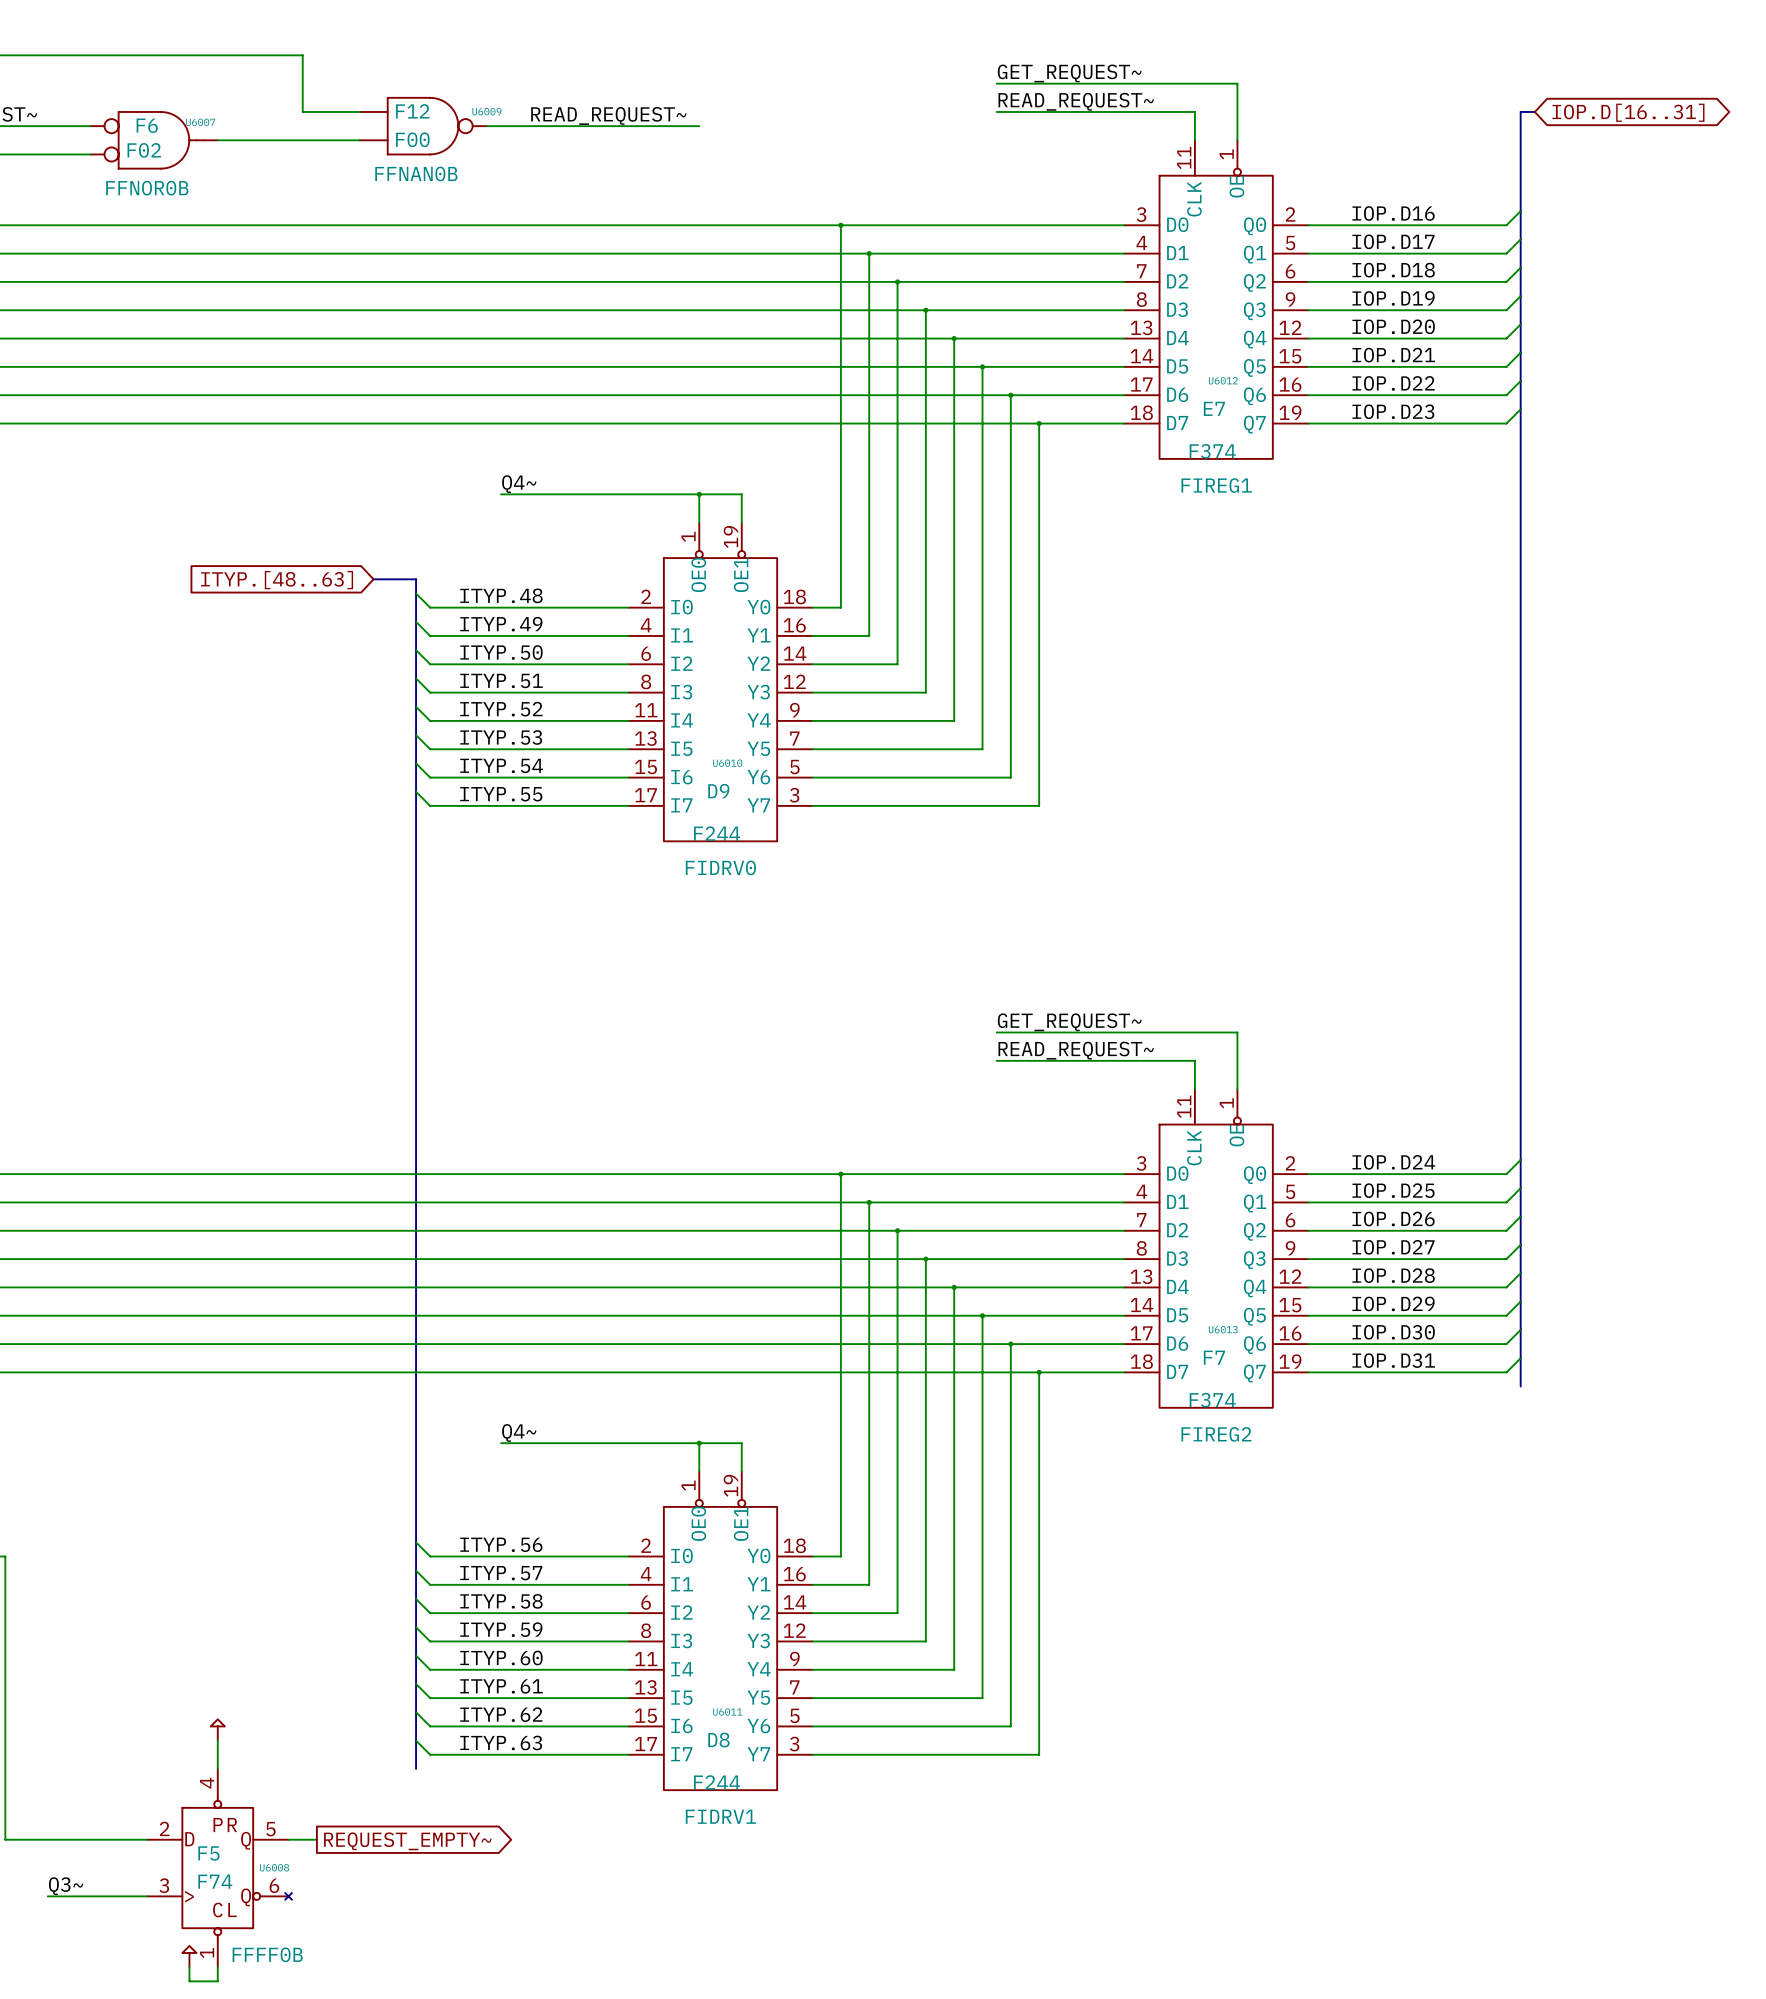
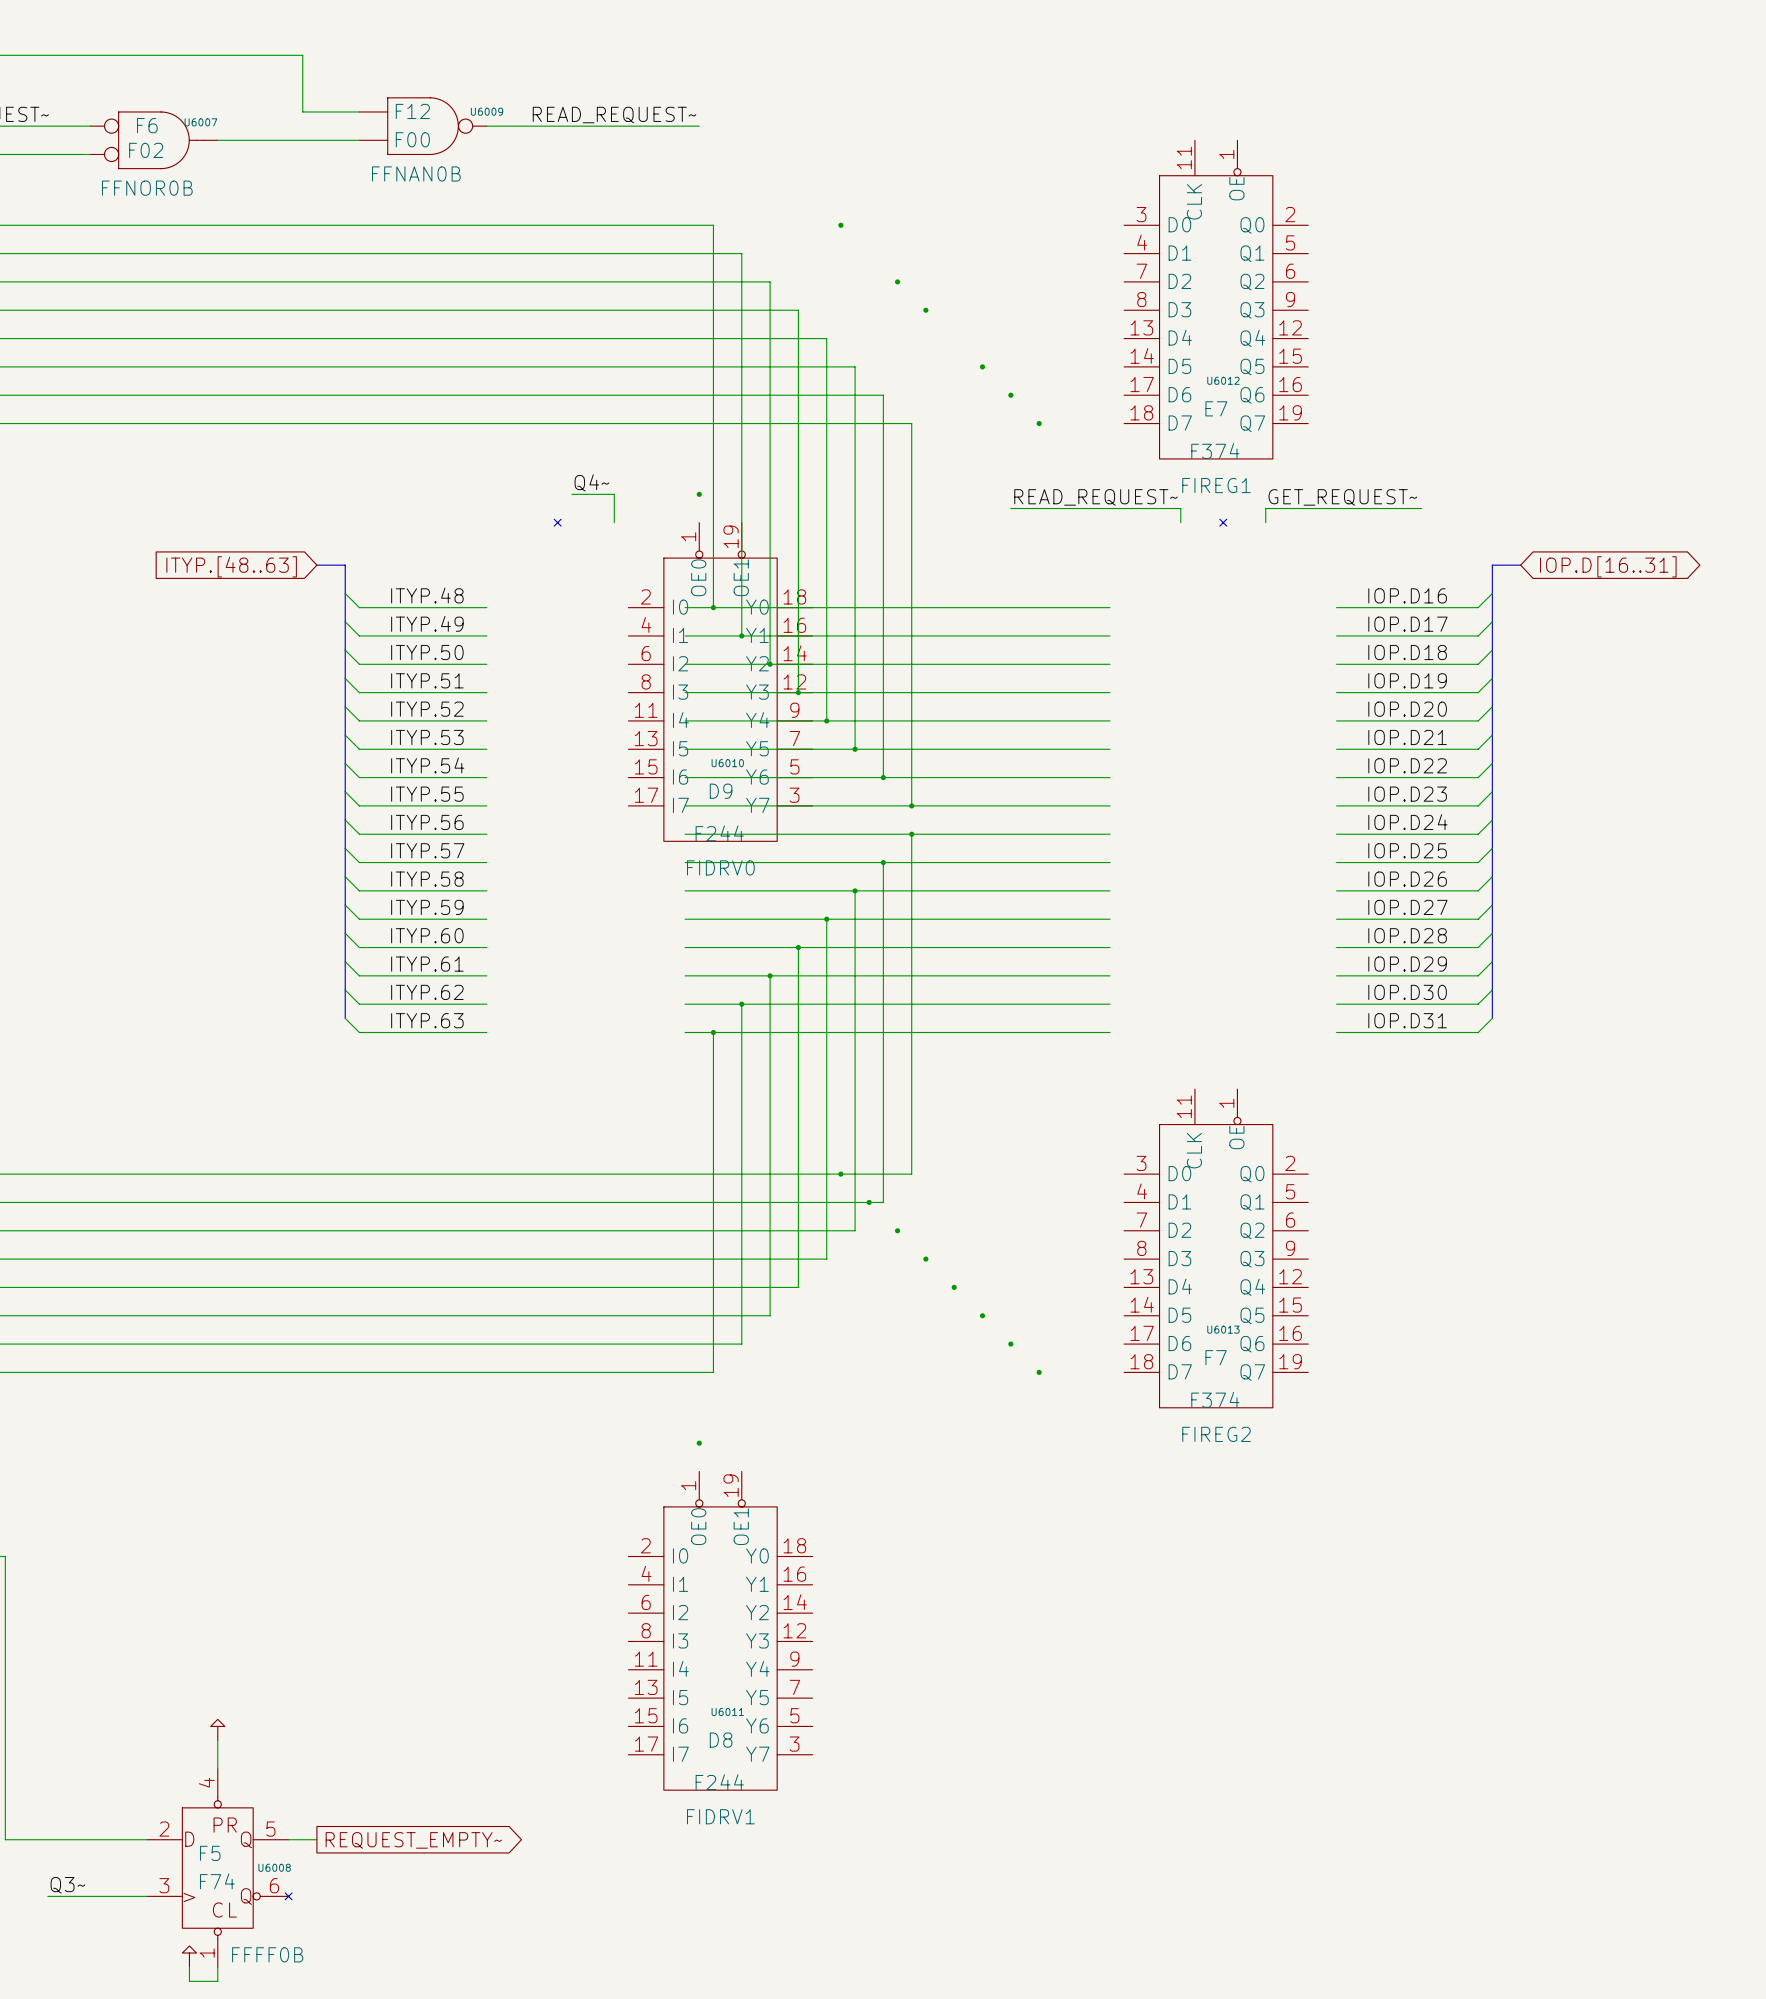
label: GET_REQUEST~ (1069, 73) -> none
wire: (996, 83) (1237, 83) (1237, 140) -> none
label: READ_REQUEST~ (1076, 101) -> none
wire: (996, 111) (1194, 111) (1194, 140) -> none
bus: (1534, 111) (1520, 111) (1520, 1386) -> none
global label: IOP.D[16..31] (1628, 112) -> none
wire: (1520, 211) (1506, 225) (1308, 225) -> none
label: IOP.D16 (1393, 213) -> none
wire: (713, 225) (1124, 225) -> (713, 225) (713, 607)
wire: (840, 225) (840, 607) -> (1109, 607) (840, 607)
wire: (1520, 239) (1506, 253) (1308, 253) -> none
label: IOP.D17 (1393, 241) -> none
wire: (741, 253) (1124, 253) -> (741, 253) (741, 494)
wire: (869, 253) (869, 635) -> (1109, 635) (869, 635)
junction: (869, 253) -> none
wire: (1520, 267) (1506, 281) (1308, 281) -> none
label: IOP.D18 (1393, 270) -> none
wire: (770, 281) (1124, 281) -> (770, 281) (770, 664)
wire: (897, 281) (897, 664) -> (1109, 664) (897, 664)
wire: (1520, 296) (1506, 310) (1308, 310) -> none
label: IOP.D19 (1393, 298) -> none
wire: (798, 310) (1124, 310) -> (798, 310) (798, 692)
wire: (925, 310) (925, 692) -> (1109, 692) (925, 692)
wire: (1520, 324) (1506, 338) (1308, 338) -> none
label: IOP.D20 (1393, 326) -> none
wire: (826, 338) (1124, 338) -> (826, 338) (826, 720)
wire: (954, 338) (954, 720) -> (1109, 720) (954, 720)
junction: (954, 338) -> none
wire: (1520, 352) (1506, 366) (1308, 366) -> none
label: IOP.D21 (1393, 355) -> none
wire: (855, 366) (1124, 366) -> (855, 366) (855, 749)
wire: (982, 366) (982, 749) -> (1109, 749) (982, 749)
wire: (1520, 381) (1506, 395) (1308, 395) -> none
label: IOP.D22 (1393, 383) -> none
wire: (883, 395) (1124, 395) -> (883, 395) (883, 777)
wire: (1010, 395) (1010, 777) -> (1109, 777) (1010, 777)
wire: (1520, 409) (1506, 423) (1308, 423) -> none
label: IOP.D23 (1393, 411) -> none
wire: (911, 423) (1124, 423) -> (911, 423) (911, 805)
wire: (1039, 423) (1039, 805) -> (1109, 805) (1039, 805)
label position: Q4~ (519, 484) -> Q4~ (591, 482)
wire: (501, 494) (571, 494) -> none
wire: (614, 494) (741, 494) -> (614, 494) (614, 522)
wire: (699, 494) (699, 522) -> none
label: none -> READ_REQUEST~ (1096, 497)
label: none -> GET_REQUEST~ (1342, 497)
wire: none -> (1010, 508) (1180, 508) (1180, 522)
wire: none -> (1421, 508) (1265, 508) (1265, 522)
no-connect mark: none -> (557, 522)
wire: none -> (741, 522) (741, 635)
no-connect mark: none -> (1223, 522)
bus: none -> (316, 565) (345, 565) (345, 1018)
bus: none -> (1520, 565) (1492, 565) (1492, 1018)
global label: none -> IOP.D[16..31] (1608, 566)
bus: (373, 579) (416, 579) (416, 1768) -> none
global label position: ITYP.[48..63] (277, 580) -> ITYP.[48..63] (231, 566)
wire: (416, 593) (430, 607) -> (345, 593) (359, 607) (430, 607)
wire: none -> (1492, 593) (1478, 607) (1336, 607)
label position: ITYP.48 (501, 595) -> ITYP.48 (427, 595)
label: none -> IOP.D16 (1407, 595)
wire: (486, 607) (628, 607) -> none
wire: none -> (685, 607) (812, 607)
junction: none -> (713, 607)
wire: (416, 621) (430, 635) -> (345, 621) (359, 635) (430, 635)
wire: none -> (1492, 621) (1478, 635) (1336, 635)
label position: ITYP.49 (501, 624) -> ITYP.49 (427, 623)
label: none -> IOP.D17 (1407, 624)
wire: (486, 635) (628, 635) -> none
wire: none -> (685, 635) (812, 635)
junction: none -> (741, 635)
wire: (416, 650) (430, 664) -> (345, 650) (359, 664) (430, 664)
wire: none -> (1492, 650) (1478, 664) (1336, 664)
label position: ITYP.50 (501, 652) -> ITYP.50 (427, 652)
label: none -> IOP.D18 (1407, 652)
wire: (486, 664) (628, 664) -> none
wire: none -> (685, 664) (812, 664)
junction: none -> (770, 664)
wire: (416, 678) (430, 692) -> (345, 678) (359, 692) (430, 692)
wire: none -> (1492, 678) (1478, 692) (1336, 692)
label position: ITYP.51 (501, 680) -> ITYP.51 (427, 680)
label: none -> IOP.D19 (1407, 680)
wire: (486, 692) (628, 692) -> none
wire: none -> (685, 692) (812, 692)
junction: none -> (798, 692)
wire: (416, 706) (430, 720) -> (345, 706) (359, 720) (430, 720)
wire: none -> (1492, 706) (1478, 720) (1336, 720)
label position: ITYP.52 (501, 709) -> ITYP.52 (427, 709)
label: none -> IOP.D20 (1407, 709)
wire: (486, 720) (628, 720) -> none
wire: none -> (685, 720) (812, 720)
junction: none -> (826, 720)
wire: (416, 735) (430, 749) -> (345, 735) (359, 749) (430, 749)
wire: none -> (1492, 735) (1478, 749) (1336, 749)
label position: ITYP.53 (501, 737) -> ITYP.53 (427, 737)
label: none -> IOP.D21 (1407, 737)
wire: (486, 749) (628, 749) -> none
wire: none -> (685, 749) (812, 749)
junction: none -> (855, 749)
wire: (416, 763) (430, 777) -> (345, 763) (359, 777) (430, 777)
wire: none -> (1492, 763) (1478, 777) (1336, 777)
label position: ITYP.54 (501, 765) -> ITYP.54 (427, 765)
label: none -> IOP.D22 (1407, 765)
wire: (486, 777) (628, 777) -> none
wire: none -> (685, 777) (812, 777)
junction: none -> (883, 777)
wire: (416, 791) (430, 805) -> (345, 791) (359, 805) (430, 805)
wire: none -> (1492, 791) (1478, 805) (1336, 805)
label position: ITYP.55 (501, 794) -> ITYP.55 (427, 794)
label: none -> IOP.D23 (1407, 794)
wire: (486, 805) (628, 805) -> none
wire: none -> (685, 805) (812, 805)
junction: none -> (911, 805)
wire: none -> (345, 820) (359, 834) (486, 834)
wire: none -> (1492, 820) (1478, 834) (1336, 834)
label: none -> ITYP.56 (427, 822)
label: none -> IOP.D24 (1407, 822)
wire: none -> (685, 834) (1109, 834)
junction: none -> (911, 834)
wire: none -> (345, 848) (359, 862) (486, 862)
wire: none -> (1492, 848) (1478, 862) (1336, 862)
label: none -> ITYP.57 (427, 850)
label: none -> IOP.D25 (1407, 850)
wire: none -> (685, 862) (1109, 862)
junction: none -> (883, 862)
wire: none -> (345, 876) (359, 890) (486, 890)
wire: none -> (1492, 876) (1478, 890) (1336, 890)
label: none -> ITYP.58 (427, 879)
label: none -> IOP.D26 (1407, 879)
wire: none -> (685, 890) (1109, 890)
junction: none -> (855, 890)
wire: none -> (345, 905) (359, 919) (486, 919)
wire: none -> (1492, 905) (1478, 919) (1336, 919)
label: none -> ITYP.59 (427, 907)
label: none -> IOP.D27 (1407, 907)
wire: none -> (685, 919) (1109, 919)
junction: none -> (826, 919)
wire: none -> (345, 933) (359, 947) (486, 947)
wire: none -> (1492, 933) (1478, 947) (1336, 947)
label: none -> ITYP.60 (427, 935)
label: none -> IOP.D28 (1407, 935)
wire: none -> (685, 947) (1109, 947)
junction: none -> (798, 947)
wire: none -> (345, 961) (359, 975) (486, 975)
wire: none -> (1492, 961) (1478, 975) (1336, 975)
label: none -> ITYP.61 (427, 964)
label: none -> IOP.D29 (1407, 964)
wire: none -> (685, 975) (1109, 975)
junction: none -> (770, 975)
wire: none -> (345, 990) (359, 1004) (486, 1004)
wire: none -> (1492, 990) (1478, 1004) (1336, 1004)
label: none -> ITYP.62 (427, 992)
label: none -> IOP.D30 (1407, 992)
wire: none -> (685, 1004) (1109, 1004)
junction: none -> (741, 1004)
wire: none -> (345, 1018) (359, 1032) (486, 1032)
wire: none -> (1492, 1018) (1478, 1032) (1336, 1032)
label: none -> ITYP.63 (427, 1020)
label: none -> IOP.D31 (1407, 1020)
label: GET_REQUEST~ (1069, 1022) -> none
wire: none -> (685, 1032) (996, 1032)
junction: none -> (713, 1032)
wire: (1109, 1032) (1237, 1032) (1237, 1089) -> none
label: READ_REQUEST~ (1076, 1050) -> none
wire: (996, 1060) (1194, 1060) (1194, 1089) -> none
wire: (1520, 1159) (1506, 1174) (1308, 1174) -> none
label: IOP.D24 (1393, 1162) -> none
wire: (840, 1174) (840, 1556) (812, 1556) -> none
wire: (911, 1174) (1124, 1174) -> (911, 1174) (911, 834)
wire: (1520, 1188) (1506, 1202) (1308, 1202) -> none
label: IOP.D25 (1393, 1190) -> none
wire: (869, 1202) (869, 1584) (812, 1584) -> none
wire: (883, 1202) (1124, 1202) -> (883, 1202) (883, 862)
wire: (1520, 1216) (1506, 1230) (1308, 1230) -> none
label: IOP.D26 (1393, 1218) -> none
wire: (855, 1230) (1124, 1230) -> (855, 1230) (855, 890)
wire: (897, 1230) (897, 1613) (812, 1613) -> none
wire: (1520, 1244) (1506, 1259) (1308, 1259) -> none
label: IOP.D27 (1393, 1247) -> none
wire: (826, 1259) (1124, 1259) -> (826, 1259) (826, 919)
wire: (925, 1259) (925, 1641) (812, 1641) -> none
wire: (1520, 1273) (1506, 1287) (1308, 1287) -> none
label: IOP.D28 (1393, 1275) -> none
wire: (798, 1287) (1124, 1287) -> (798, 1287) (798, 947)
wire: (954, 1287) (954, 1669) (812, 1669) -> none
wire: (1520, 1301) (1506, 1315) (1308, 1315) -> none
label: IOP.D29 (1393, 1303) -> none
wire: (770, 1315) (1124, 1315) -> (770, 1315) (770, 975)
wire: (982, 1315) (982, 1698) (812, 1698) -> none
wire: (1520, 1329) (1506, 1344) (1308, 1344) -> none
label: IOP.D30 (1393, 1332) -> none
wire: (741, 1344) (1124, 1344) -> (741, 1344) (741, 1004)
wire: (1010, 1344) (1010, 1726) (812, 1726) -> none
wire: (1520, 1358) (1506, 1372) (1308, 1372) -> none
label: IOP.D31 (1393, 1360) -> none
wire: (713, 1372) (1124, 1372) -> (713, 1372) (713, 1032)
wire: (1039, 1372) (1039, 1754) (812, 1754) -> none
label: Q4~ (519, 1432) -> none
wire: (501, 1443) (741, 1443) (741, 1471) -> none
wire: (699, 1443) (699, 1471) -> none
wire: (416, 1542) (430, 1556) (628, 1556) -> none
label: ITYP.56 (501, 1544) -> none
wire: (416, 1570) (430, 1584) (628, 1584) -> none
label: ITYP.57 (501, 1573) -> none
wire: (416, 1598) (430, 1613) (628, 1613) -> none
label: ITYP.58 (501, 1601) -> none
wire: (416, 1627) (430, 1641) (628, 1641) -> none
label: ITYP.59 (501, 1629) -> none
wire: (416, 1655) (430, 1669) (628, 1669) -> none
label: ITYP.60 (501, 1658) -> none
wire: (416, 1683) (430, 1698) (628, 1698) -> none
label: ITYP.61 (501, 1686) -> none
wire: (416, 1712) (430, 1726) (628, 1726) -> none
label: ITYP.62 (501, 1714) -> none
wire: (416, 1740) (430, 1754) (628, 1754) -> none
label: ITYP.63 (501, 1742) -> none

